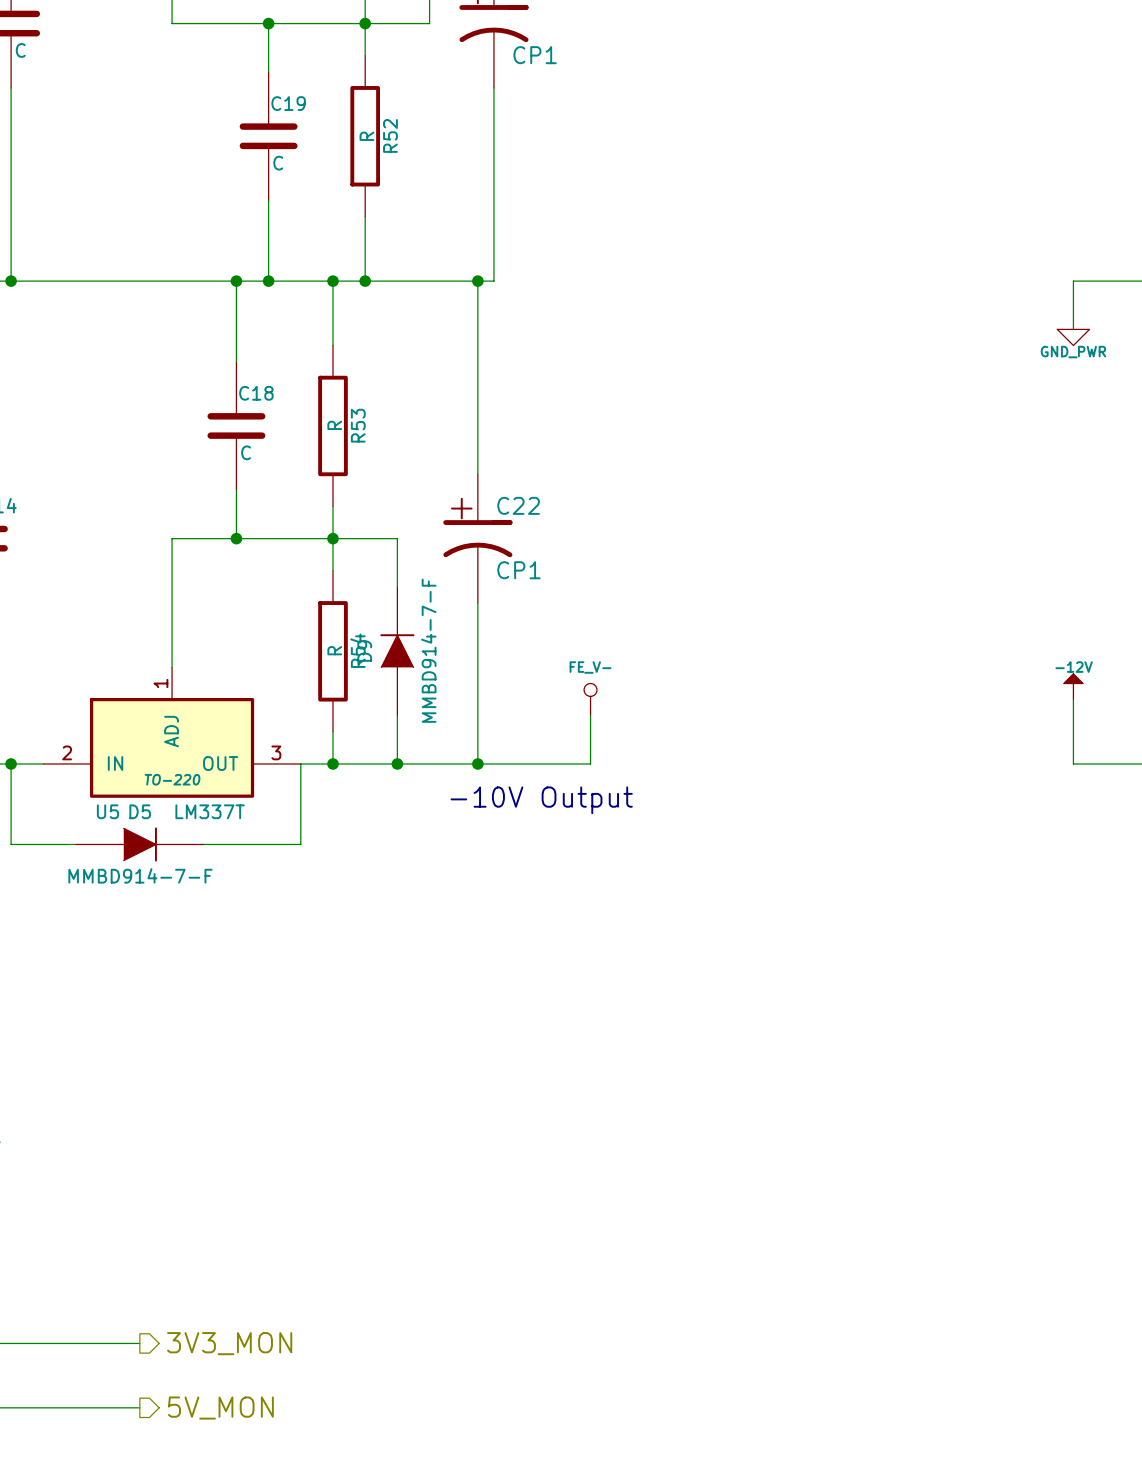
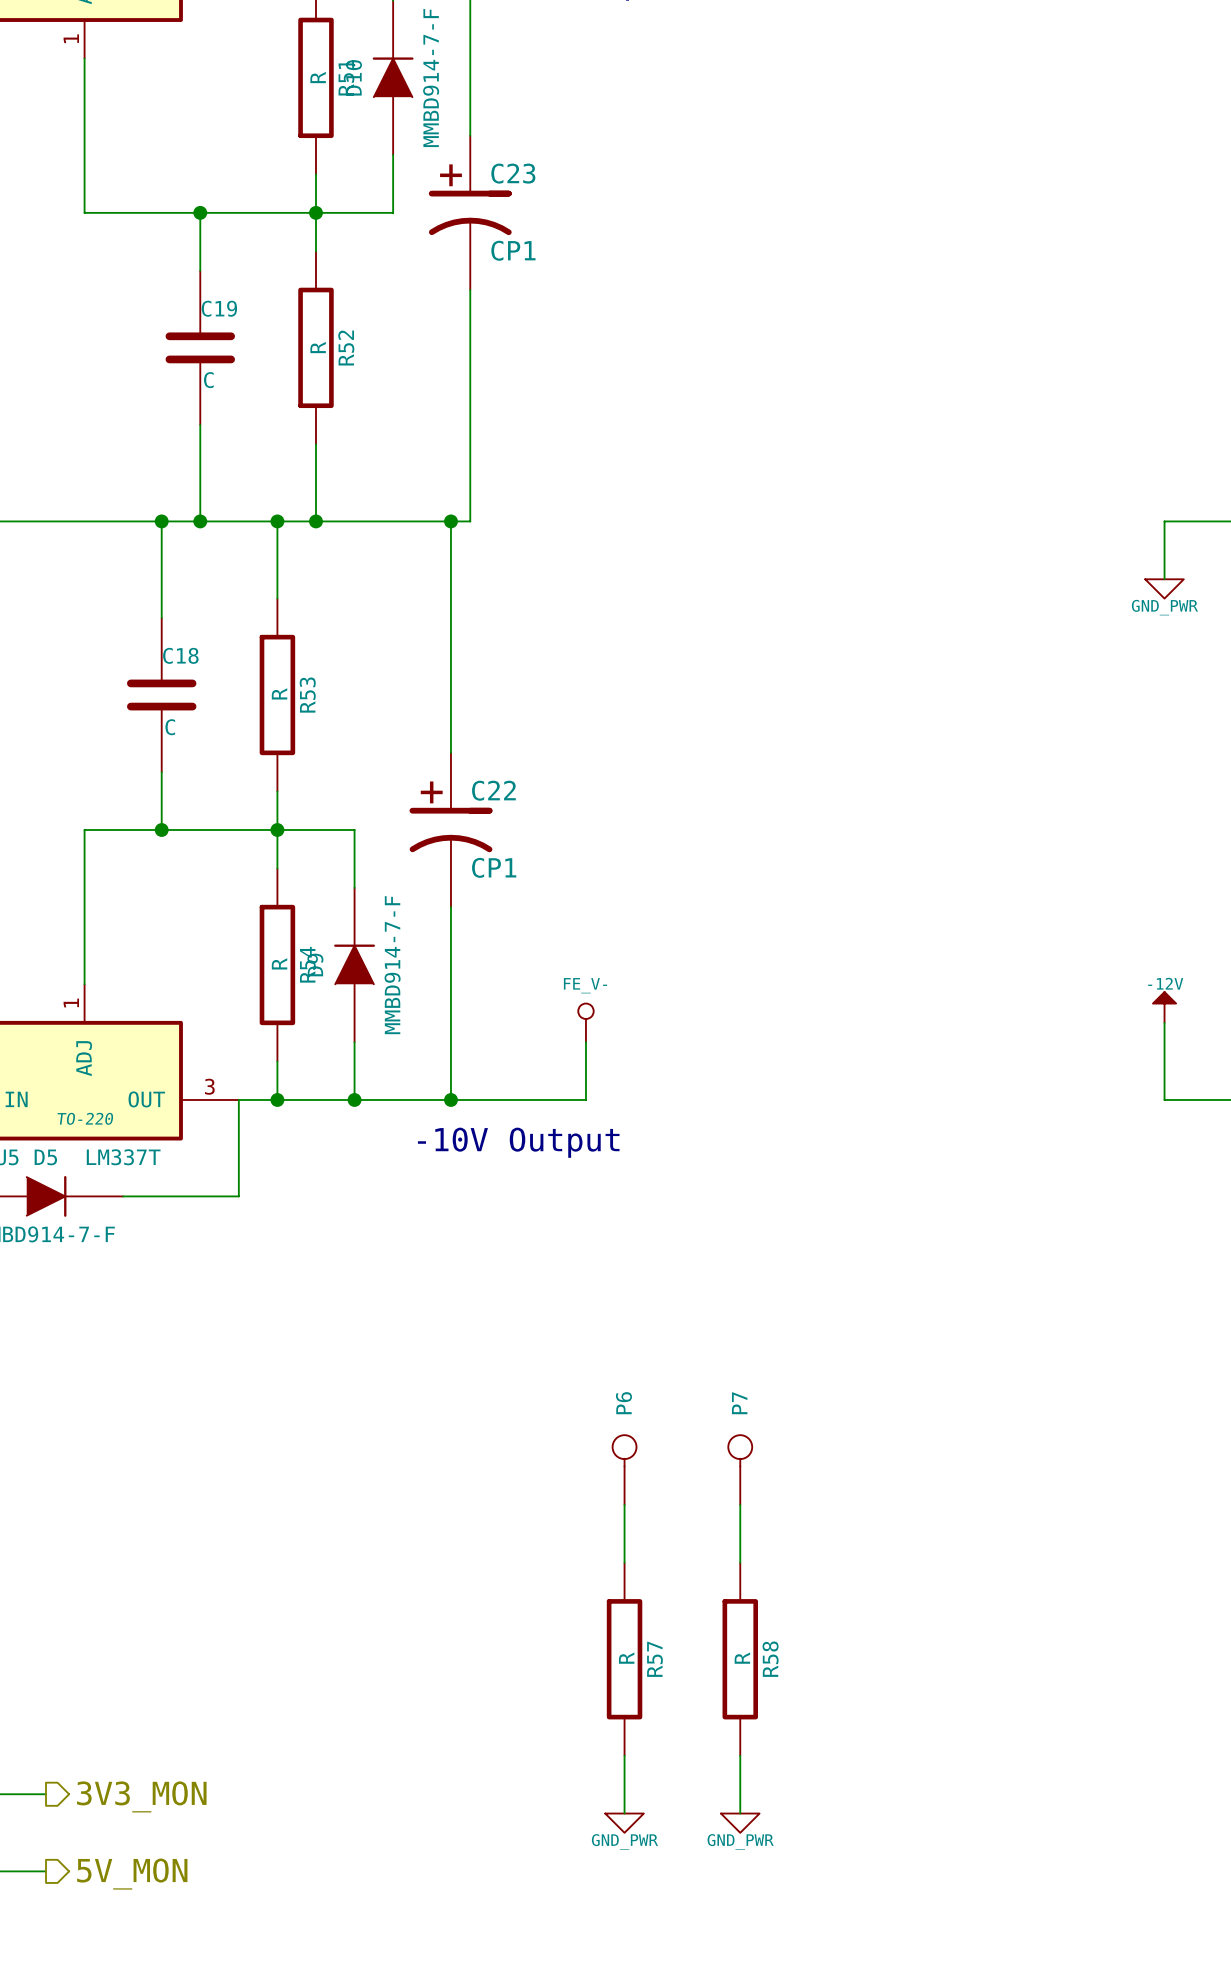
P6: none -> (624, 1470)
P7: none -> (740, 1470)
wire: none -> (624, 1504) (624, 1562)
wire: none -> (740, 1504) (740, 1562)
R57: none -> R (624, 1659)
R58: none -> R (740, 1659)
wire: none -> (624, 1755) (624, 1813)
wire: none -> (740, 1755) (740, 1813)
power symbol: none -> GND_PWR (624, 1823)
power symbol: none -> GND_PWR (740, 1823)

